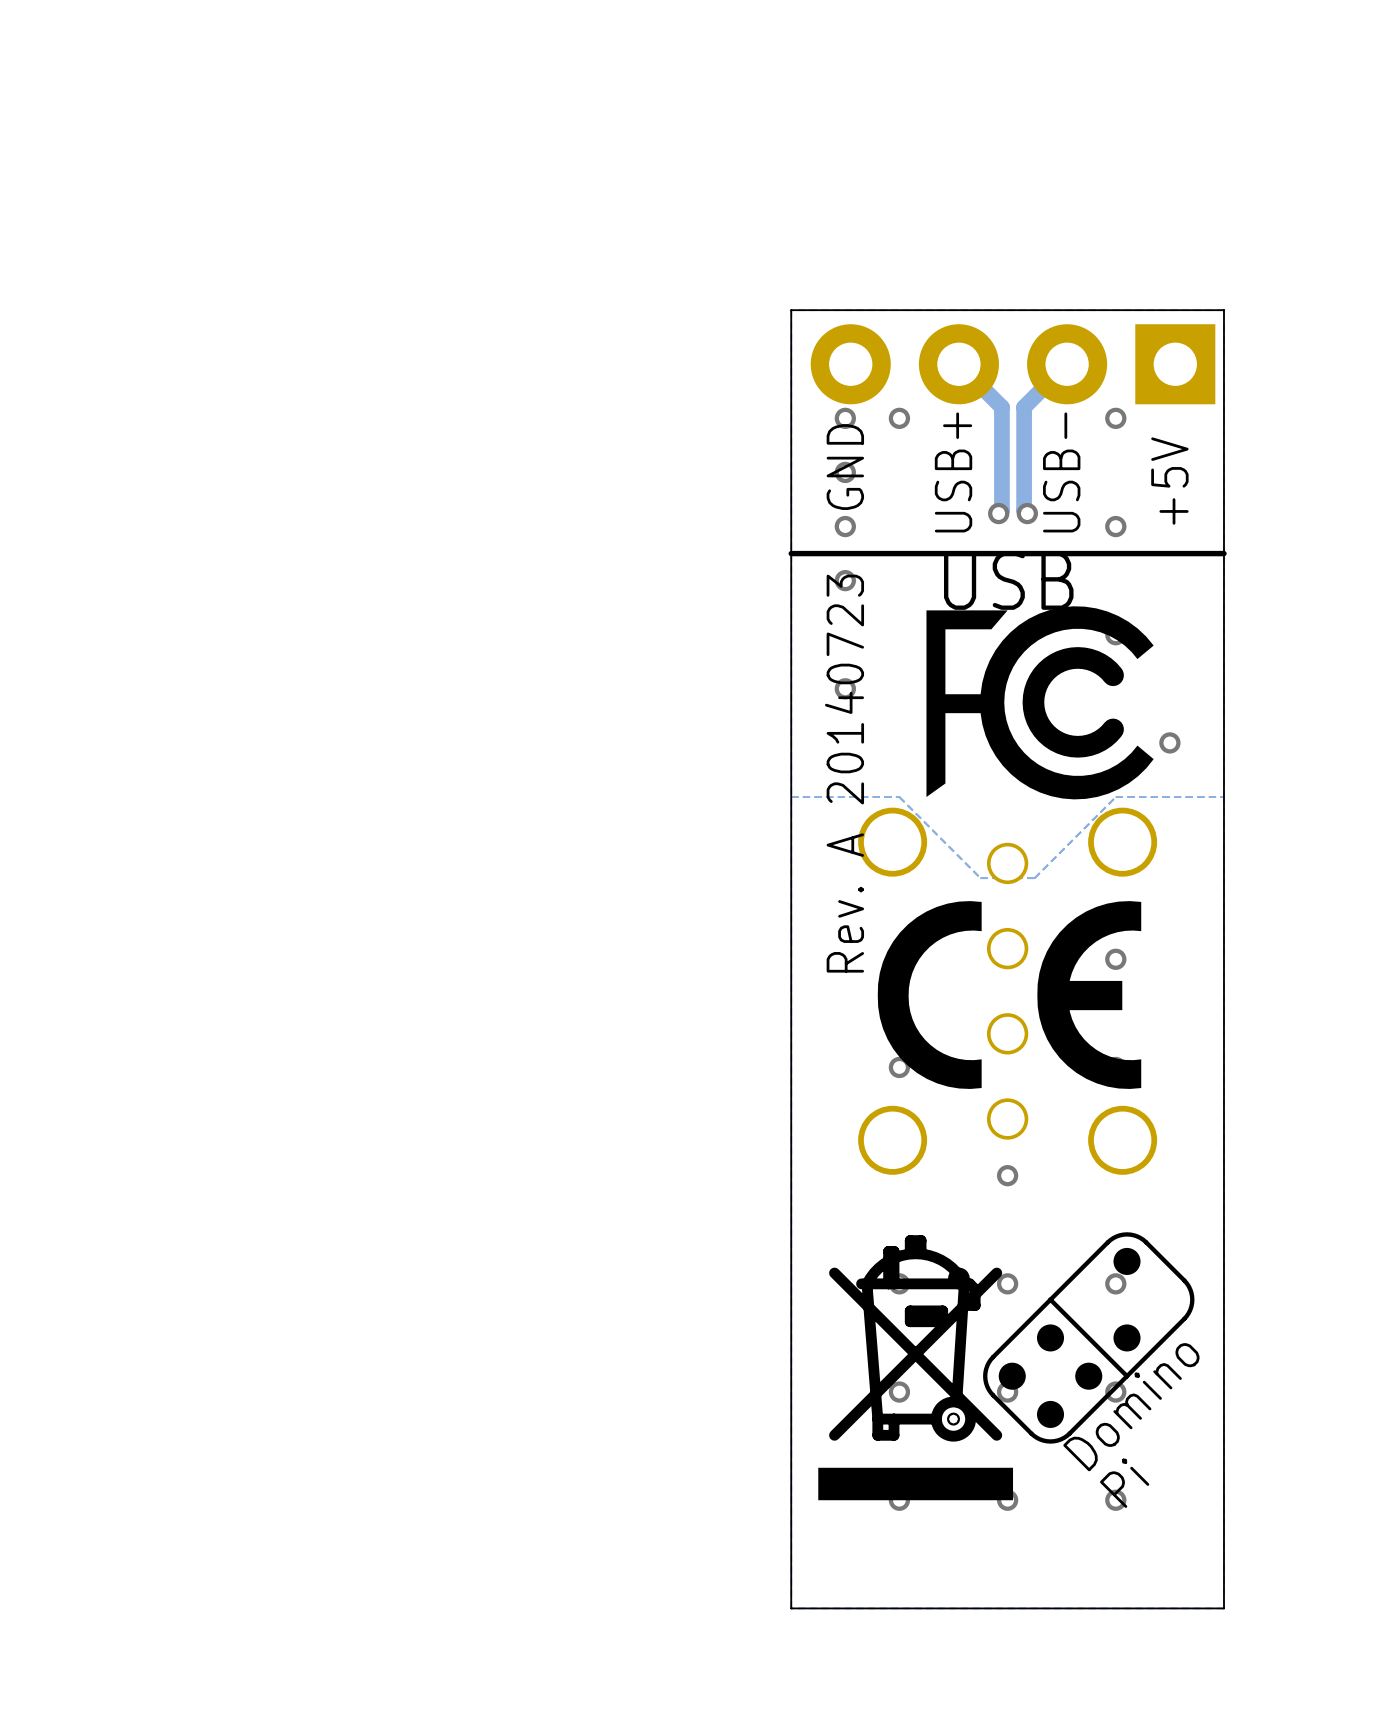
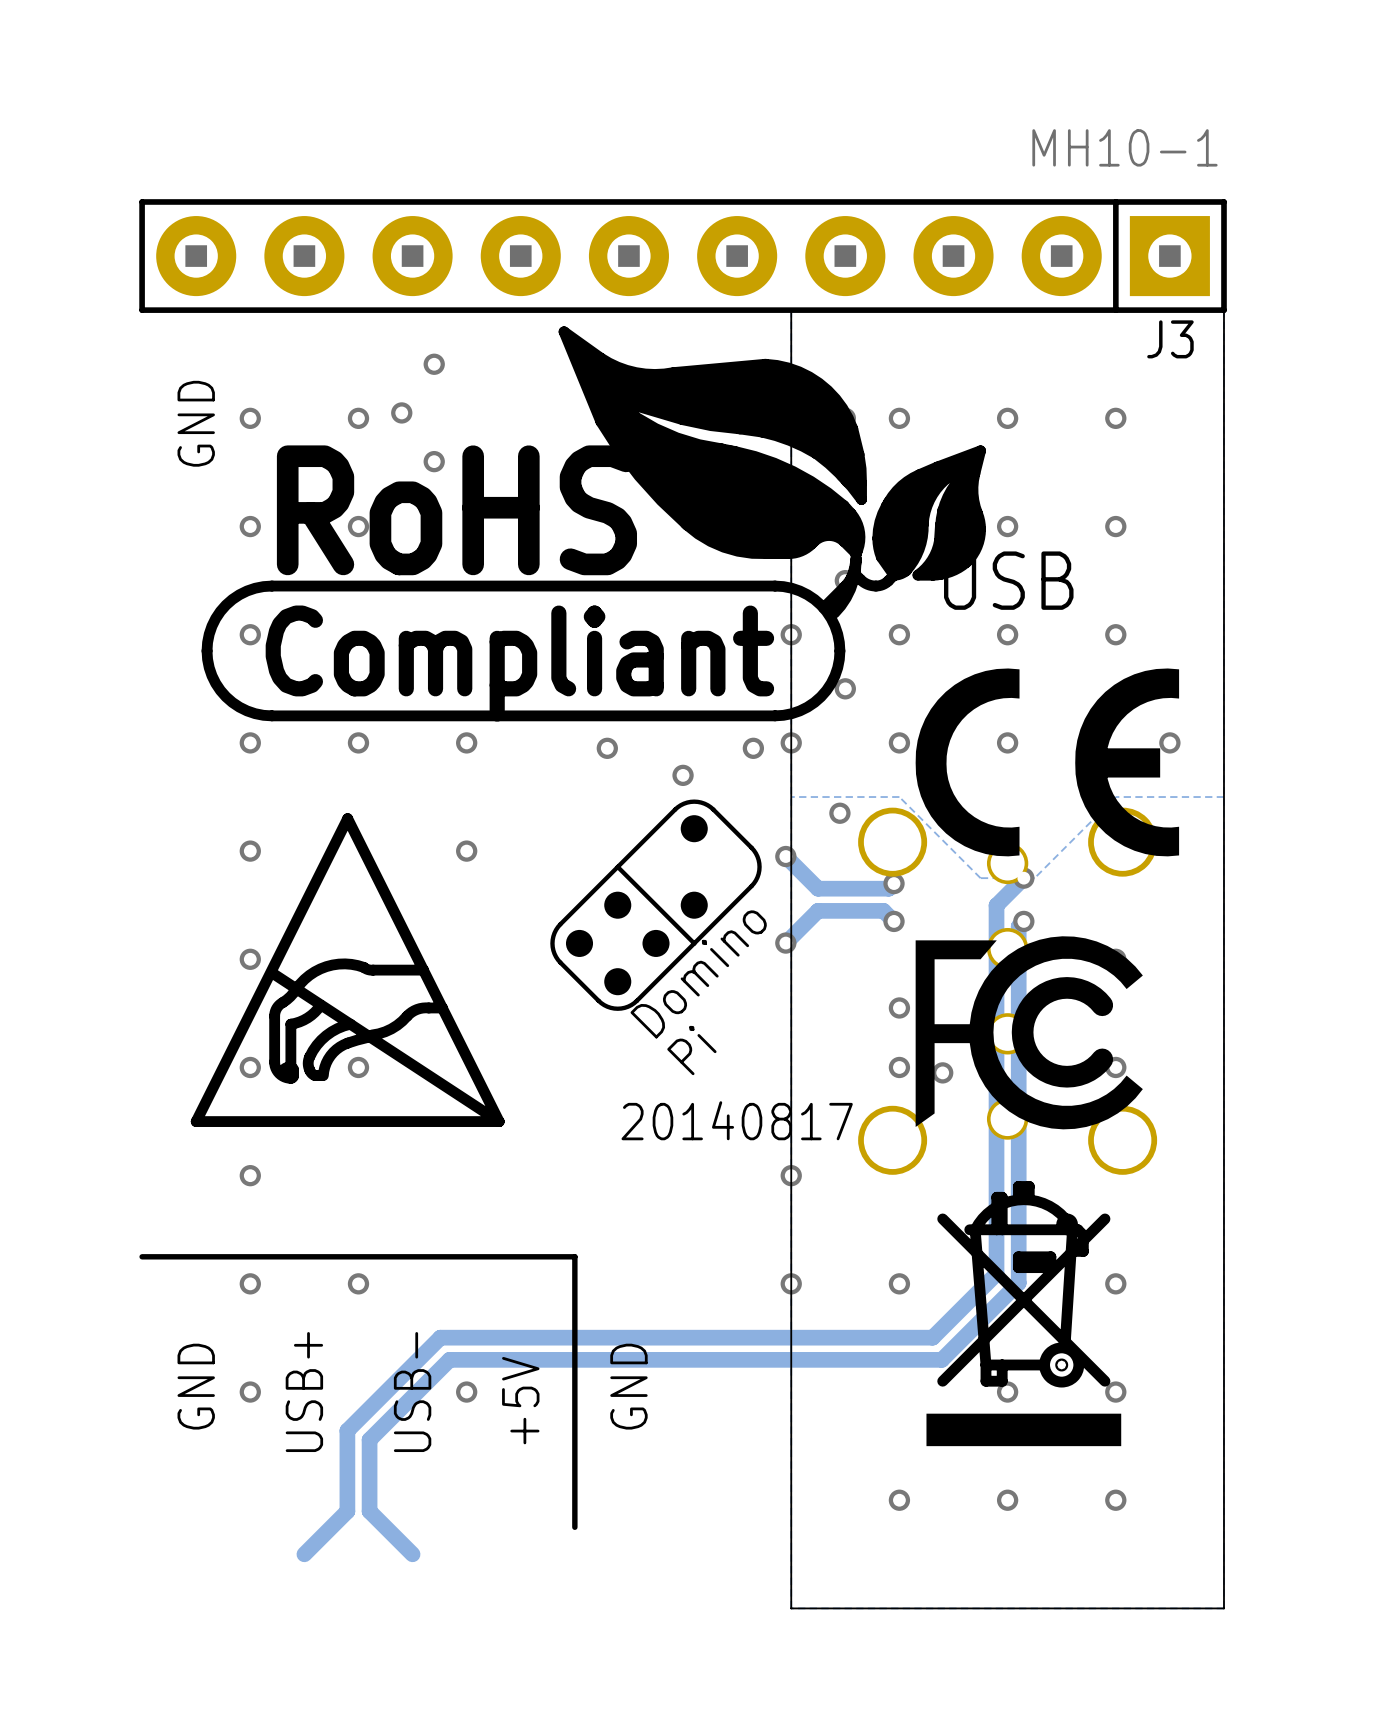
J3: none -> MH10-1 (683, 256)
drawing: none -> [201, 326, 986, 722]
via: none -> (434, 364)
track: (958, 364) (1001, 407) (1001, 510) (998, 513) -> none
part: (1013, 364) -> none
track: (1067, 364) (1024, 407) (1024, 510) (1027, 513) -> none
via: none -> (401, 412)
via: none -> (250, 418)
via: none -> (358, 418)
via: none -> (1007, 418)
text: none -> GND (196, 423)
via: none -> (434, 461)
text: GND (845, 467) -> none
text: USB+ (953, 472) -> none
text: USB- (1061, 472) -> none
text: +5V (1169, 481) -> none
via: (998, 513) -> none
via: (1027, 513) -> none
via: none -> (250, 526)
via: none -> (358, 526)
via: (845, 526) -> none
via: none -> (1007, 526)
line: (1223, 553) (791, 553) -> none
via: none -> (250, 634)
via: none -> (791, 634)
via: none -> (899, 634)
via: none -> (1007, 634)
text: 20140723 (844, 689) -> none
drawing position: (1040, 702) -> (1029, 1032)
via: none -> (250, 742)
via: none -> (358, 742)
via: none -> (466, 742)
via: none -> (791, 742)
via: none -> (899, 742)
via: none -> (1007, 742)
via: none -> (607, 748)
via: none -> (753, 748)
via: none -> (683, 775)
drawing: none -> [190, 813, 505, 1127]
via: none -> (839, 813)
via: none -> (250, 851)
via: none -> (466, 851)
track: none -> (785, 856) (818, 888) (888, 888) (894, 883)
via: none -> (785, 856)
track: none -> (1023, 878) (996, 905) (996, 1273) (932, 1337) (440, 1337) (347, 1430) (347, 1511) (304, 1554)
via: none -> (1023, 878)
via: none -> (894, 883)
text: Rev. A (845, 902) -> none
track: none -> (894, 921) (883, 910) (818, 910) (785, 943)
via: none -> (894, 921)
track: none -> (1023, 921) (1018, 926) (1018, 1283) (941, 1359) (449, 1359) (369, 1439) (369, 1511) (412, 1554)
via: none -> (1023, 921)
via: none -> (785, 943)
via: none -> (250, 959)
drawing position: (1009, 995) -> (1047, 762)
via: none -> (899, 1007)
via: none -> (250, 1067)
via: none -> (358, 1067)
via: none -> (942, 1072)
text: none -> 20140817 (737, 1120)
via: none -> (250, 1175)
via: none -> (791, 1175)
via: (1007, 1175) -> none
line: none -> (142, 1256) (574, 1256) (574, 1527)
via: none -> (250, 1283)
via: none -> (358, 1283)
via: none -> (791, 1283)
via: (1007, 1283) -> none
drawing position: (1088, 1337) -> (656, 905)
drawing position: (915, 1367) -> (1023, 1313)
text: none -> GND (196, 1386)
text: none -> GND (628, 1386)
via: none -> (250, 1392)
text: none -> USB+ (304, 1392)
text: none -> USB- (412, 1392)
via: none -> (466, 1392)
via: (899, 1392) -> none
text: none -> +5V (520, 1400)

